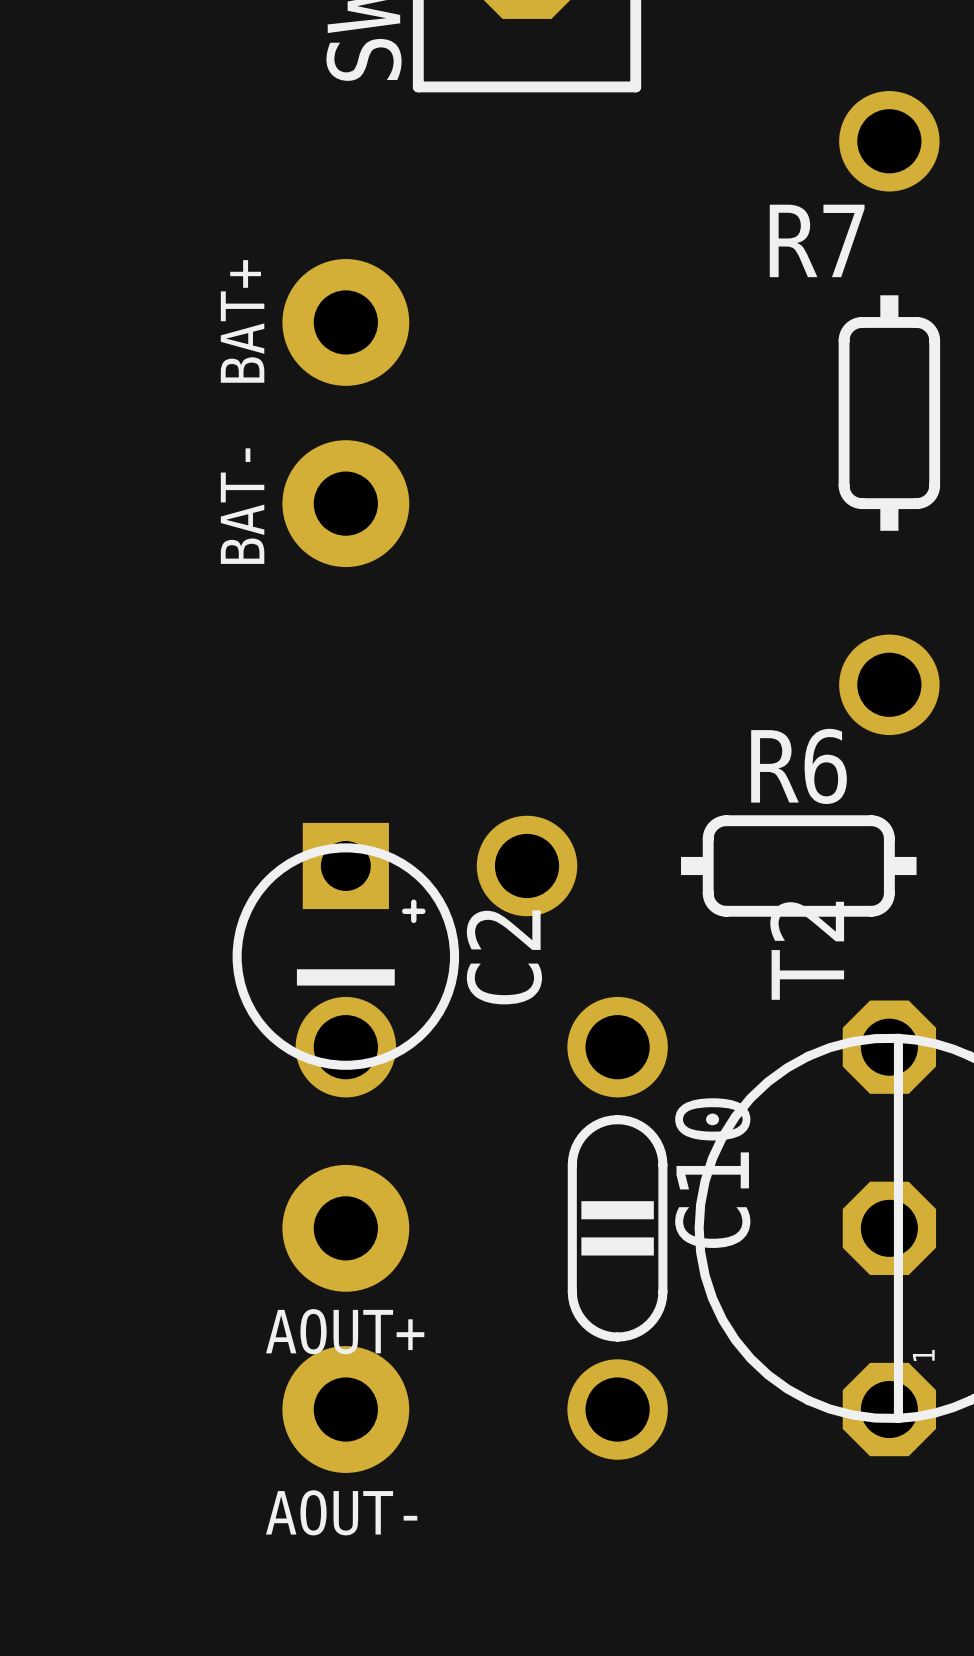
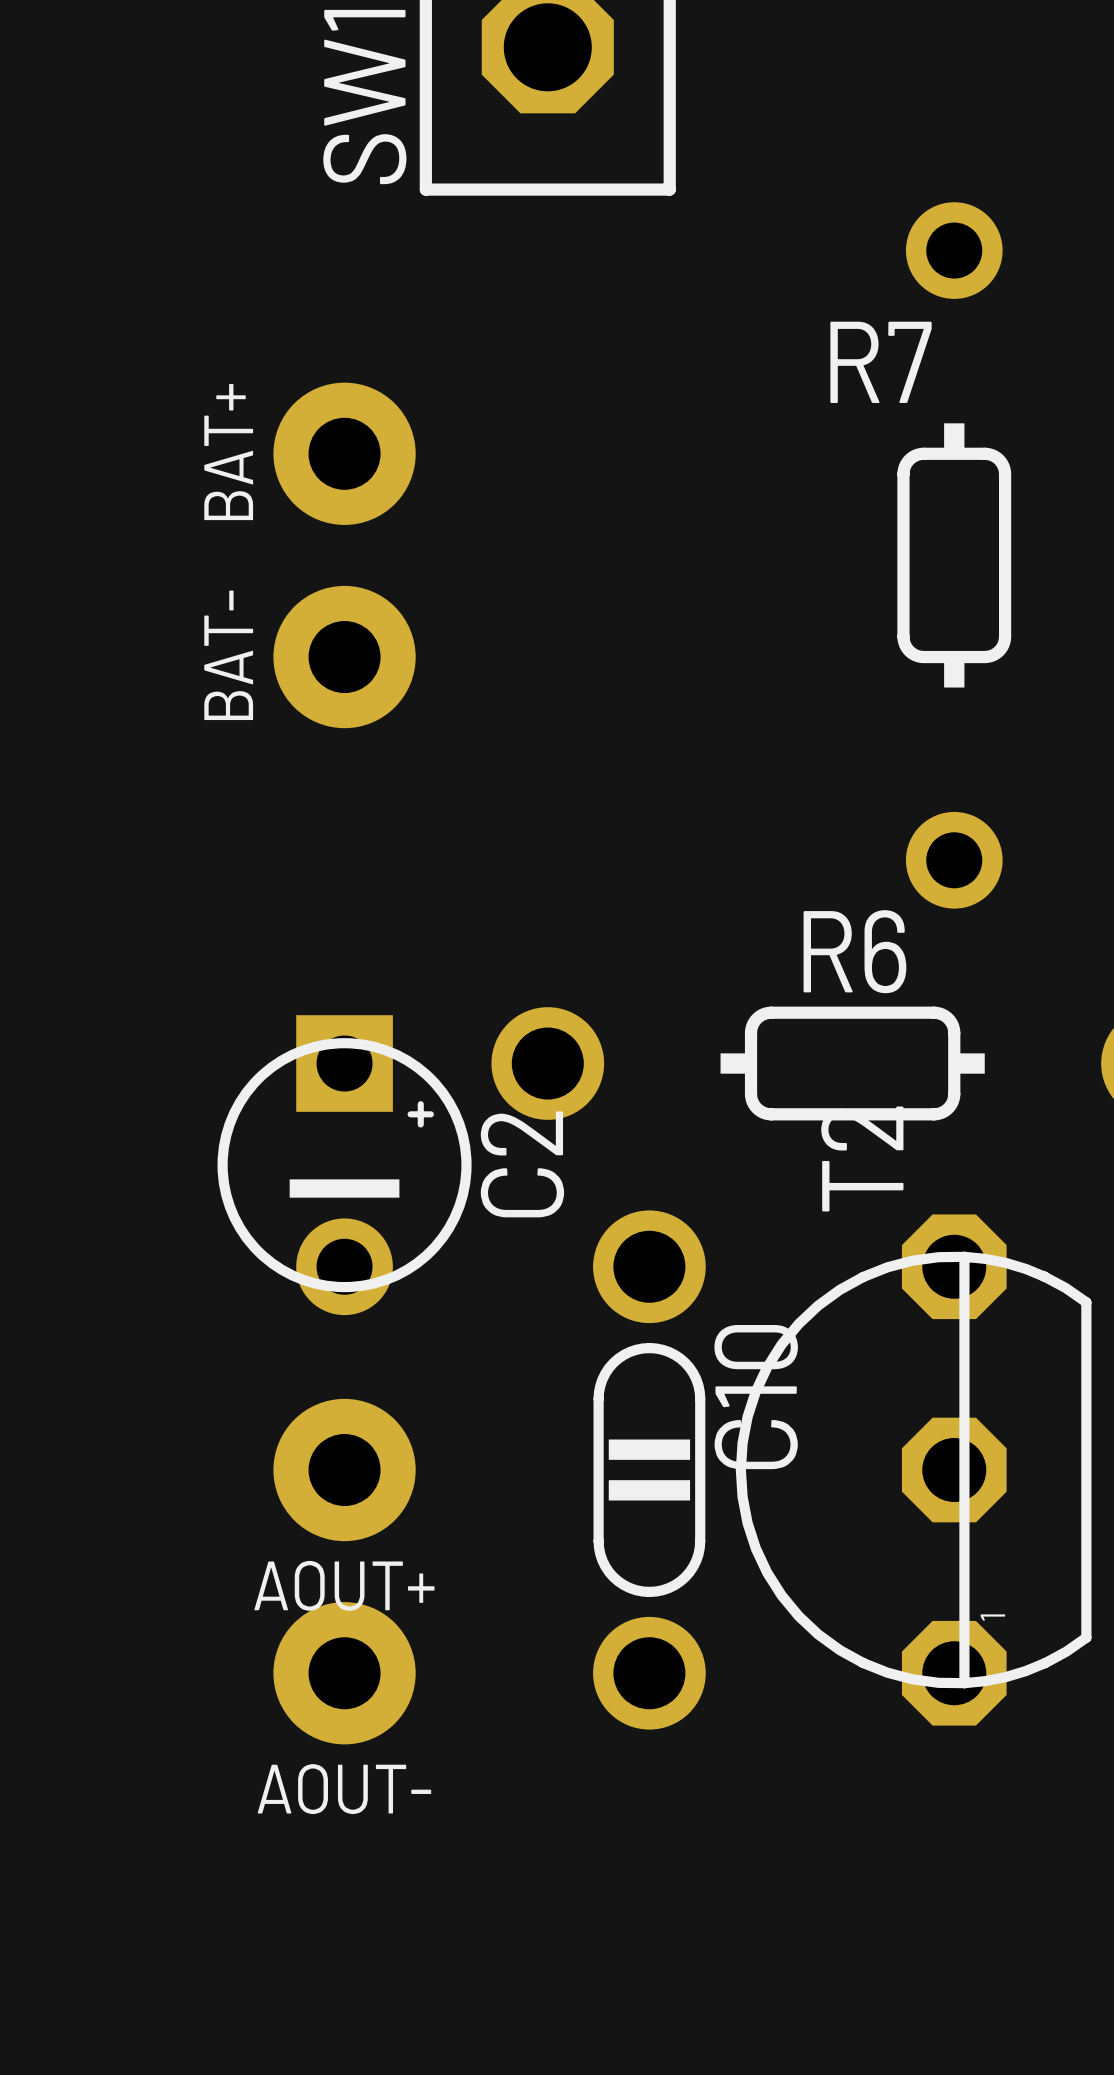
R7 footprint: [838, 91, 941, 736] -> [897, 202, 1012, 909]
C2 footprint: [232, 822, 460, 1098] -> [217, 1015, 472, 1316]

